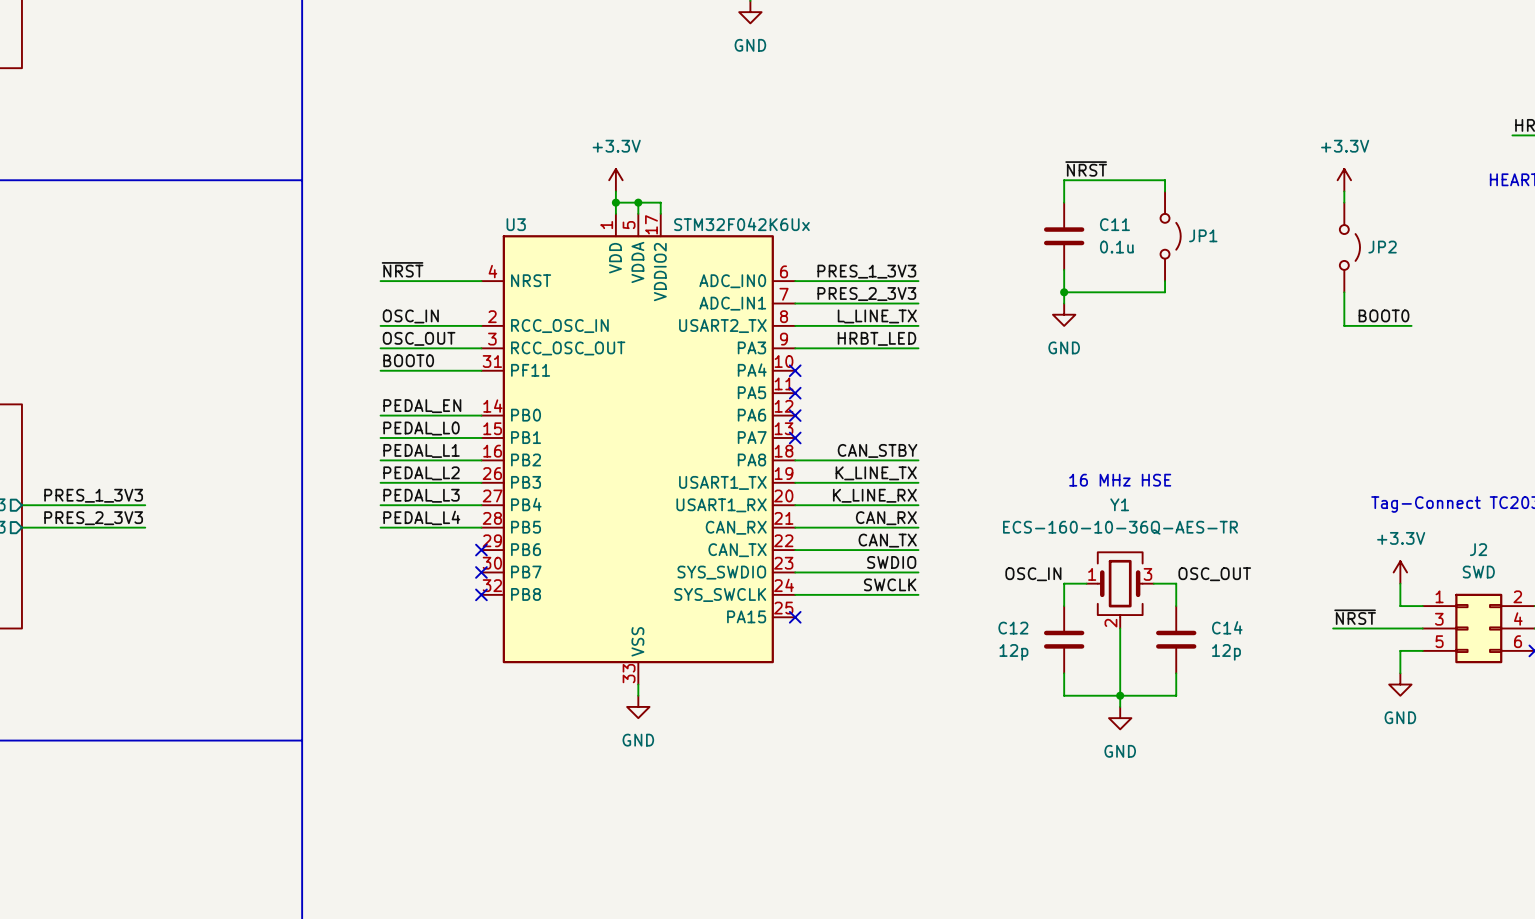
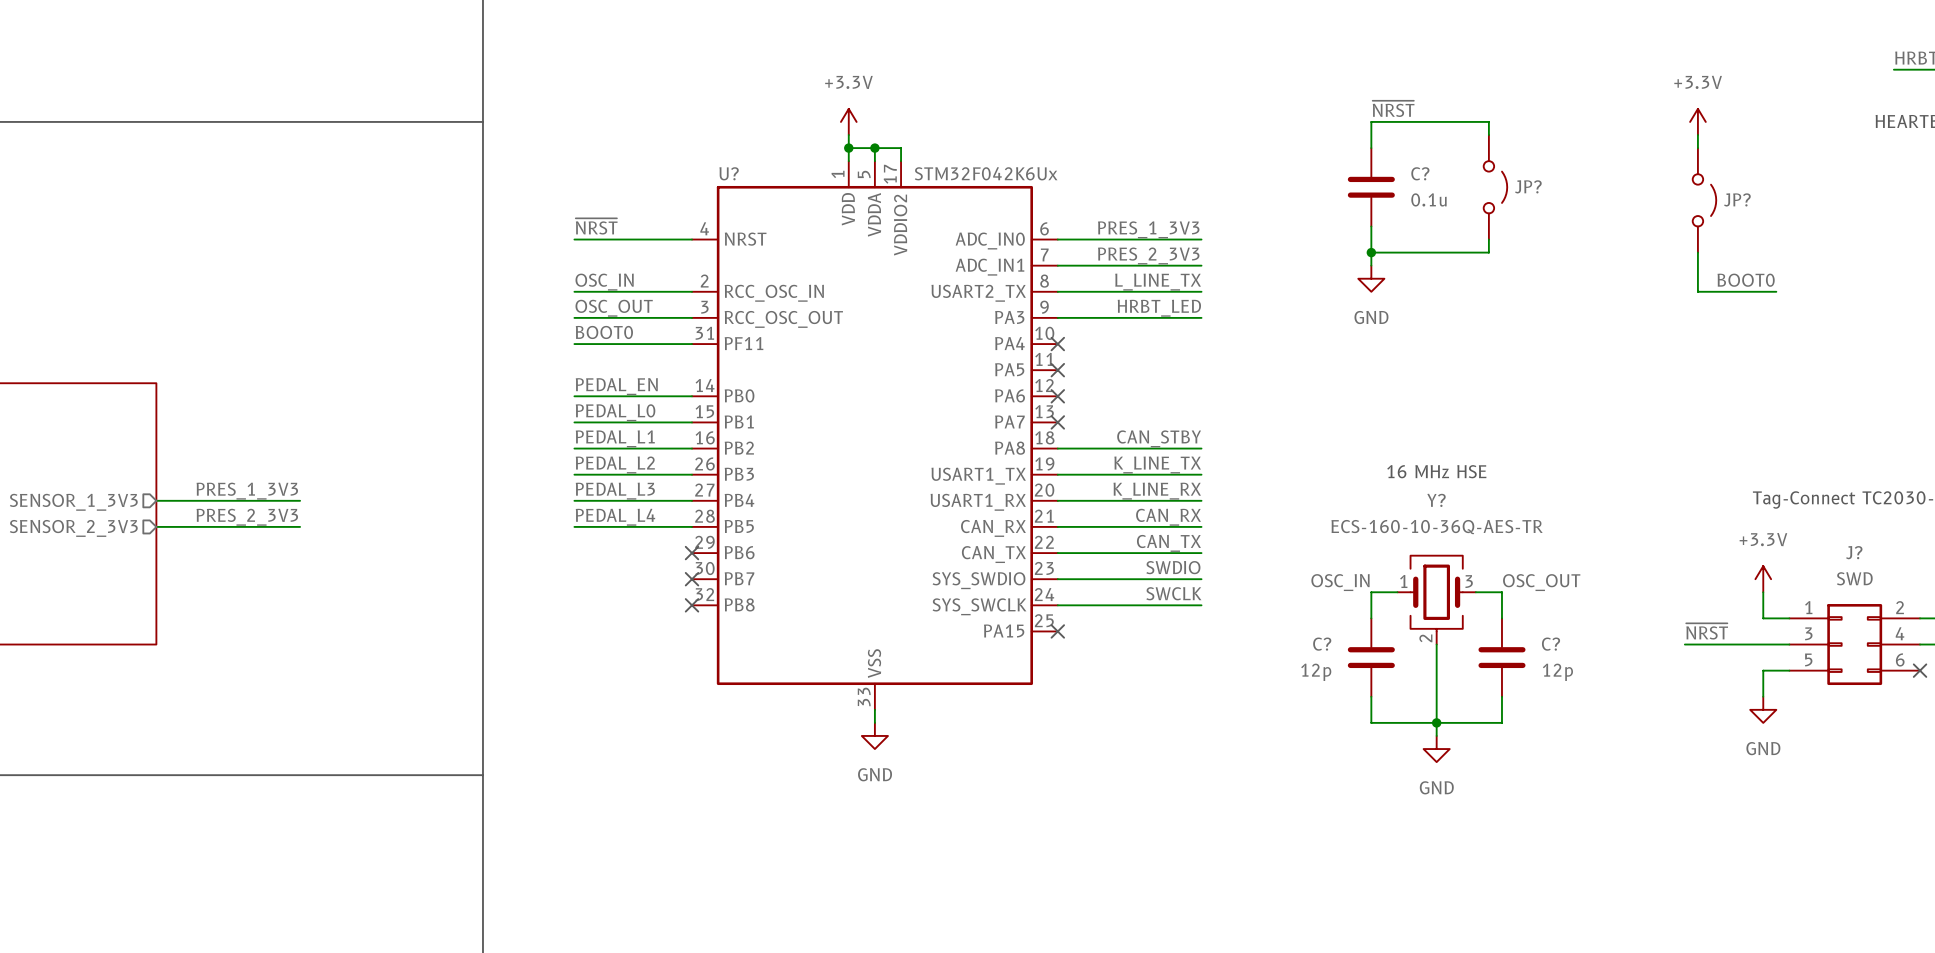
U3 name: U3 (516, 224) -> U? (729, 173)
C11 name: C11 (1114, 224) -> C? (1420, 173)
JP1 name: JP1 (1203, 235) -> JP? (1528, 186)
JP2 name: JP2 (1382, 247) -> JP? (1737, 199)
Y1 name: Y1 (1119, 504) -> Y? (1436, 500)
J2 name: J2 (1478, 549) -> J? (1854, 552)
C14 name: C14 (1227, 627) -> C? (1551, 644)
C12 name: C12 (1013, 628) -> C? (1322, 644)

